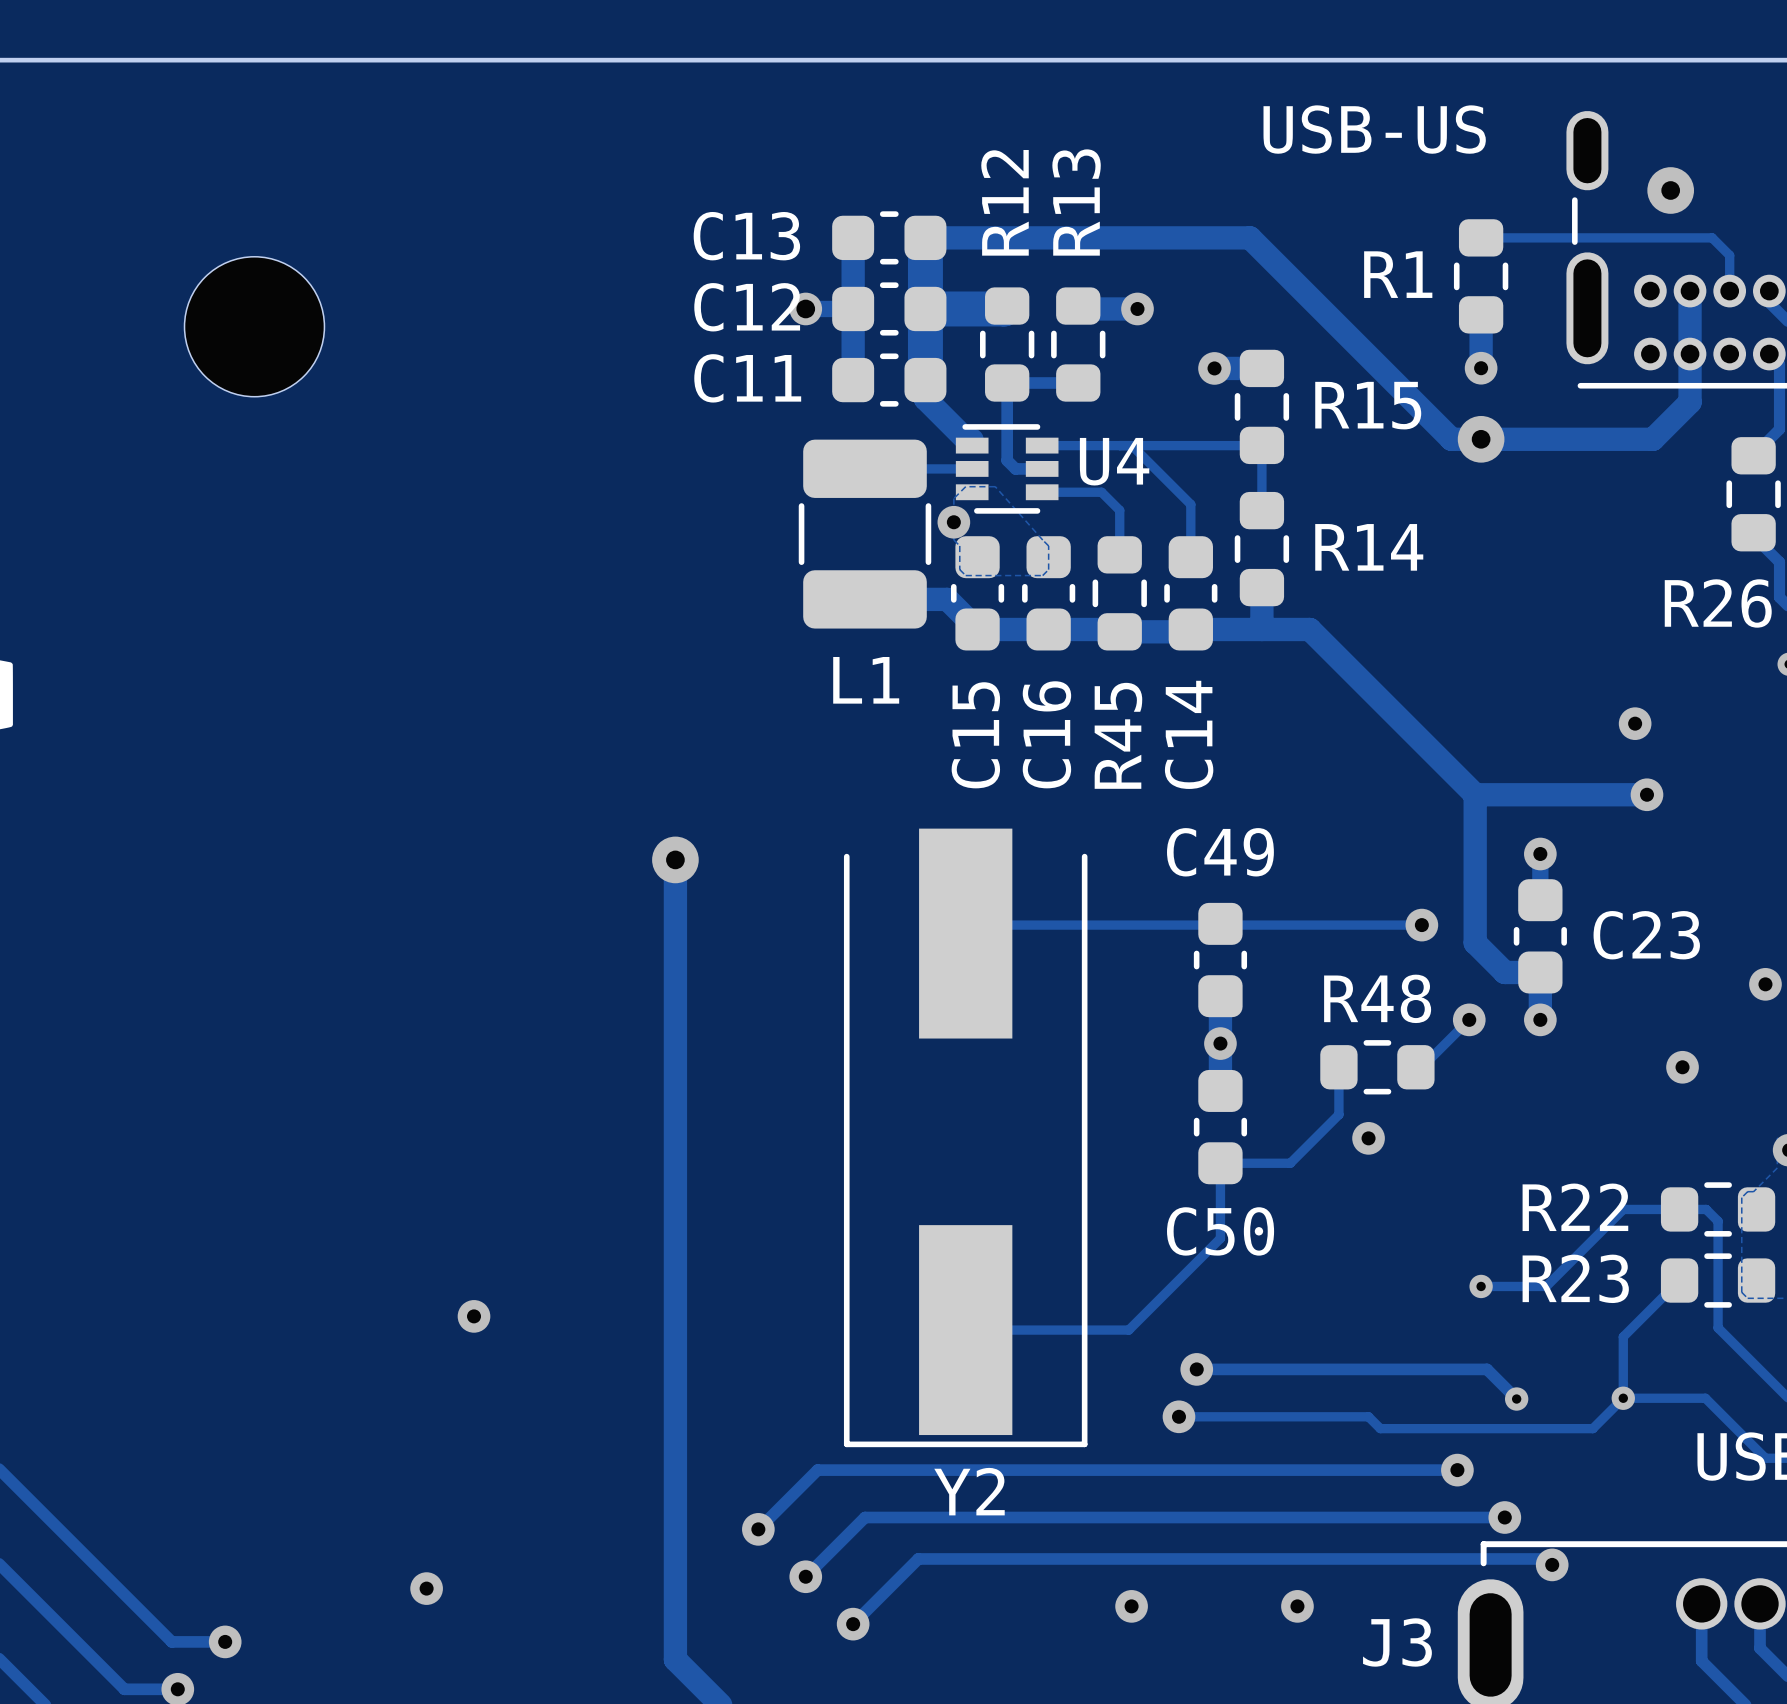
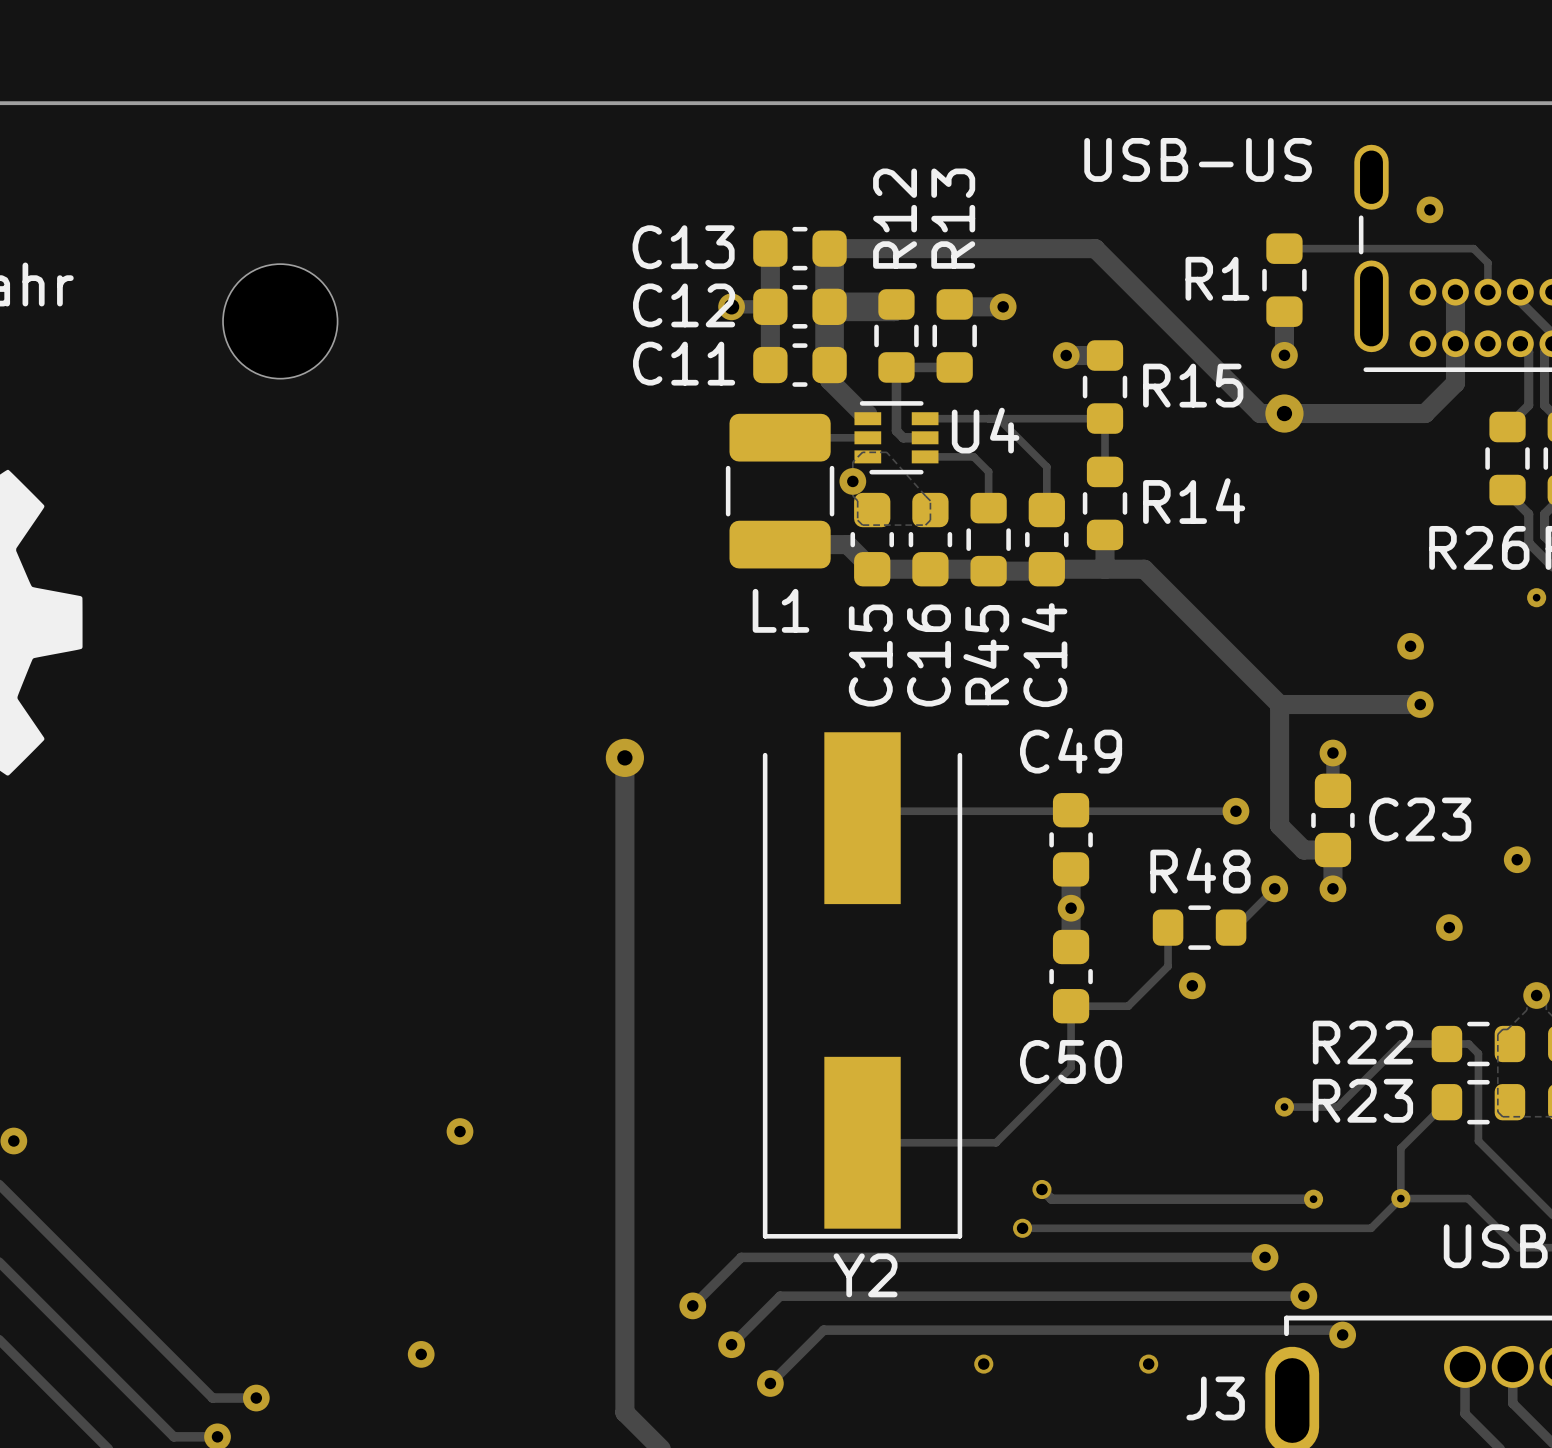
via size: [1647, 167, 1695, 214] -> [1416, 196, 1444, 224]
track: (1196, 1369) (1487, 1369) (1516, 1399) -> (1041, 1189) (1051, 1199) (1313, 1199)
via position: (1196, 1369) -> (1041, 1189)
track: (1178, 1416) (1368, 1416) (1380, 1428) (1592, 1428) -> (1022, 1228) (1371, 1228) (1375, 1223)
via position: (1178, 1416) -> (1022, 1228)
via position: (1131, 1606) -> (983, 1364)
via position: (1297, 1606) -> (1148, 1364)

